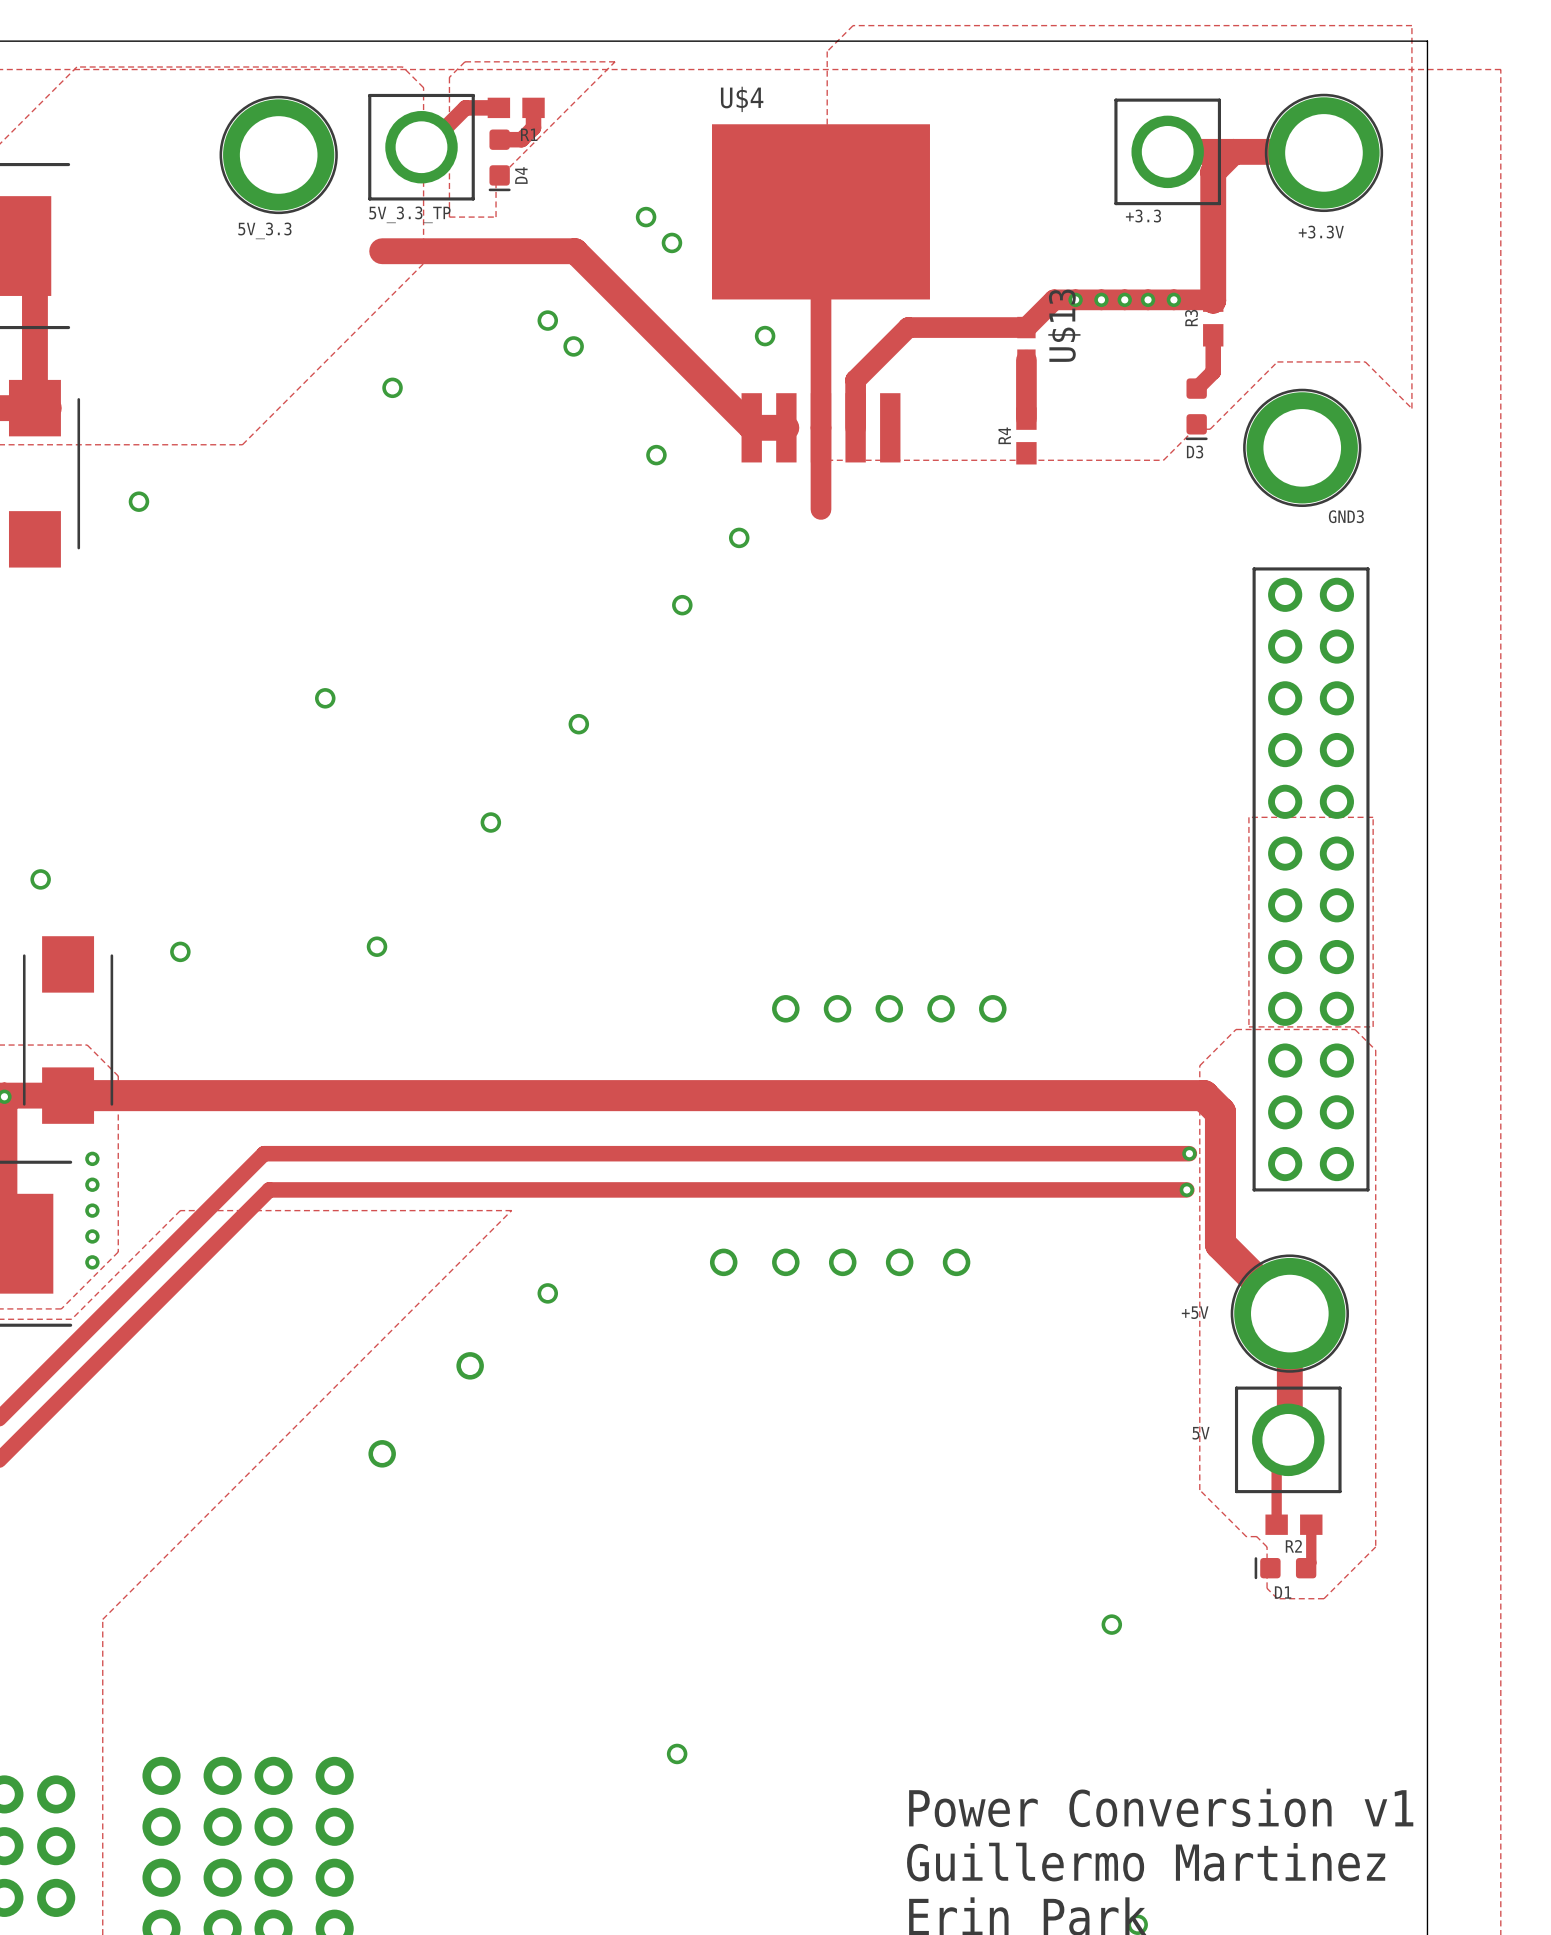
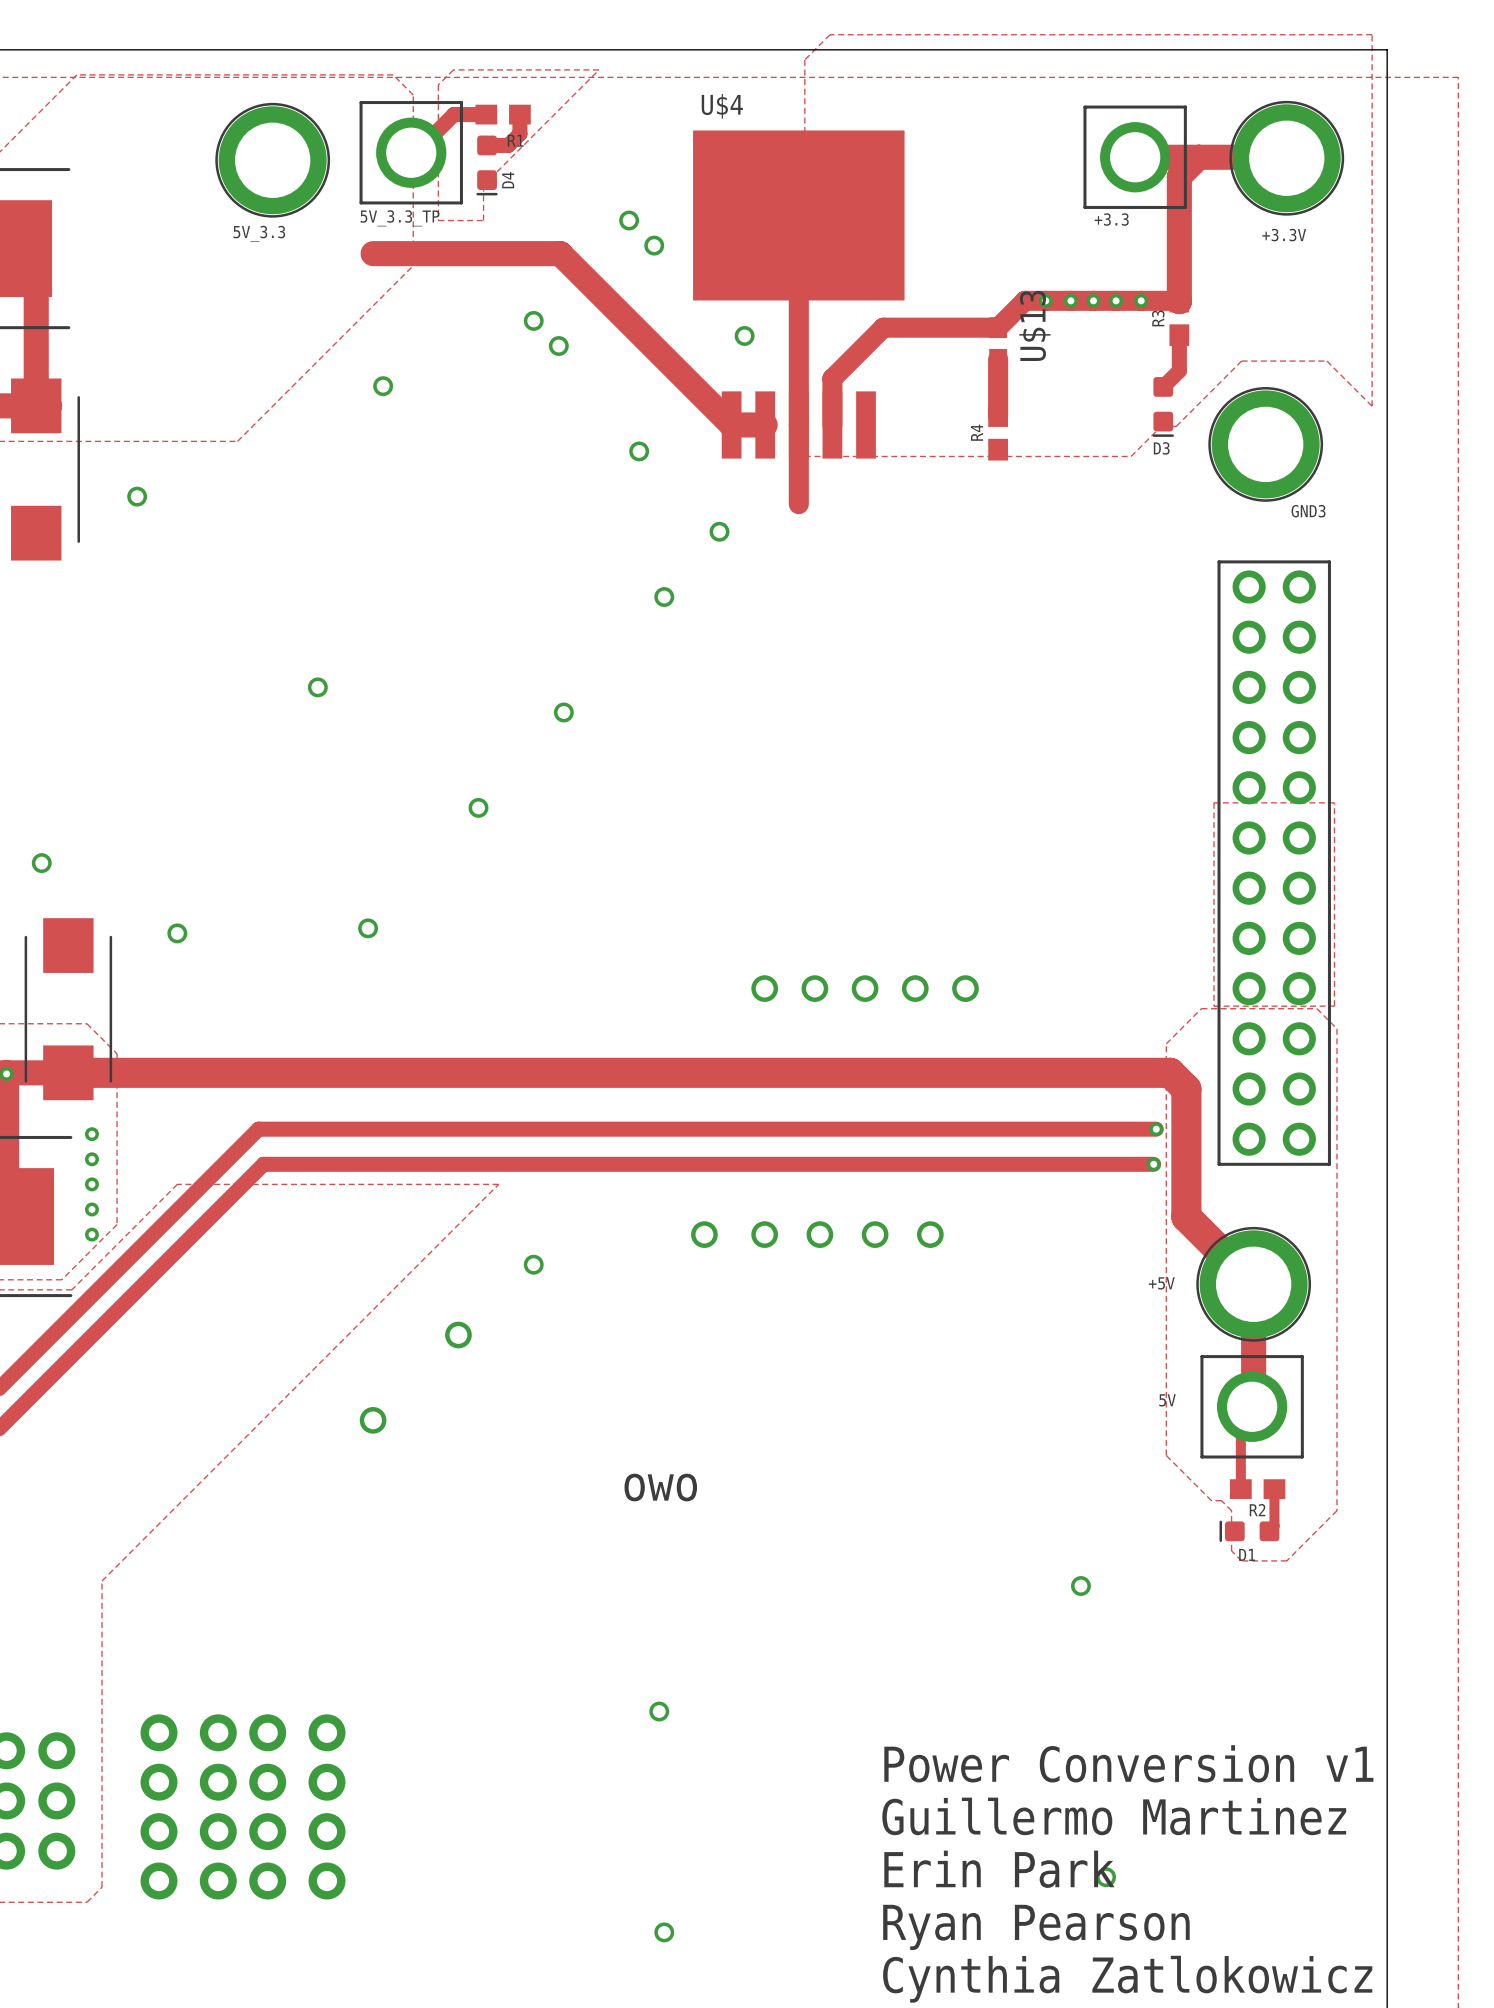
text: none -> owo (660, 1487)

